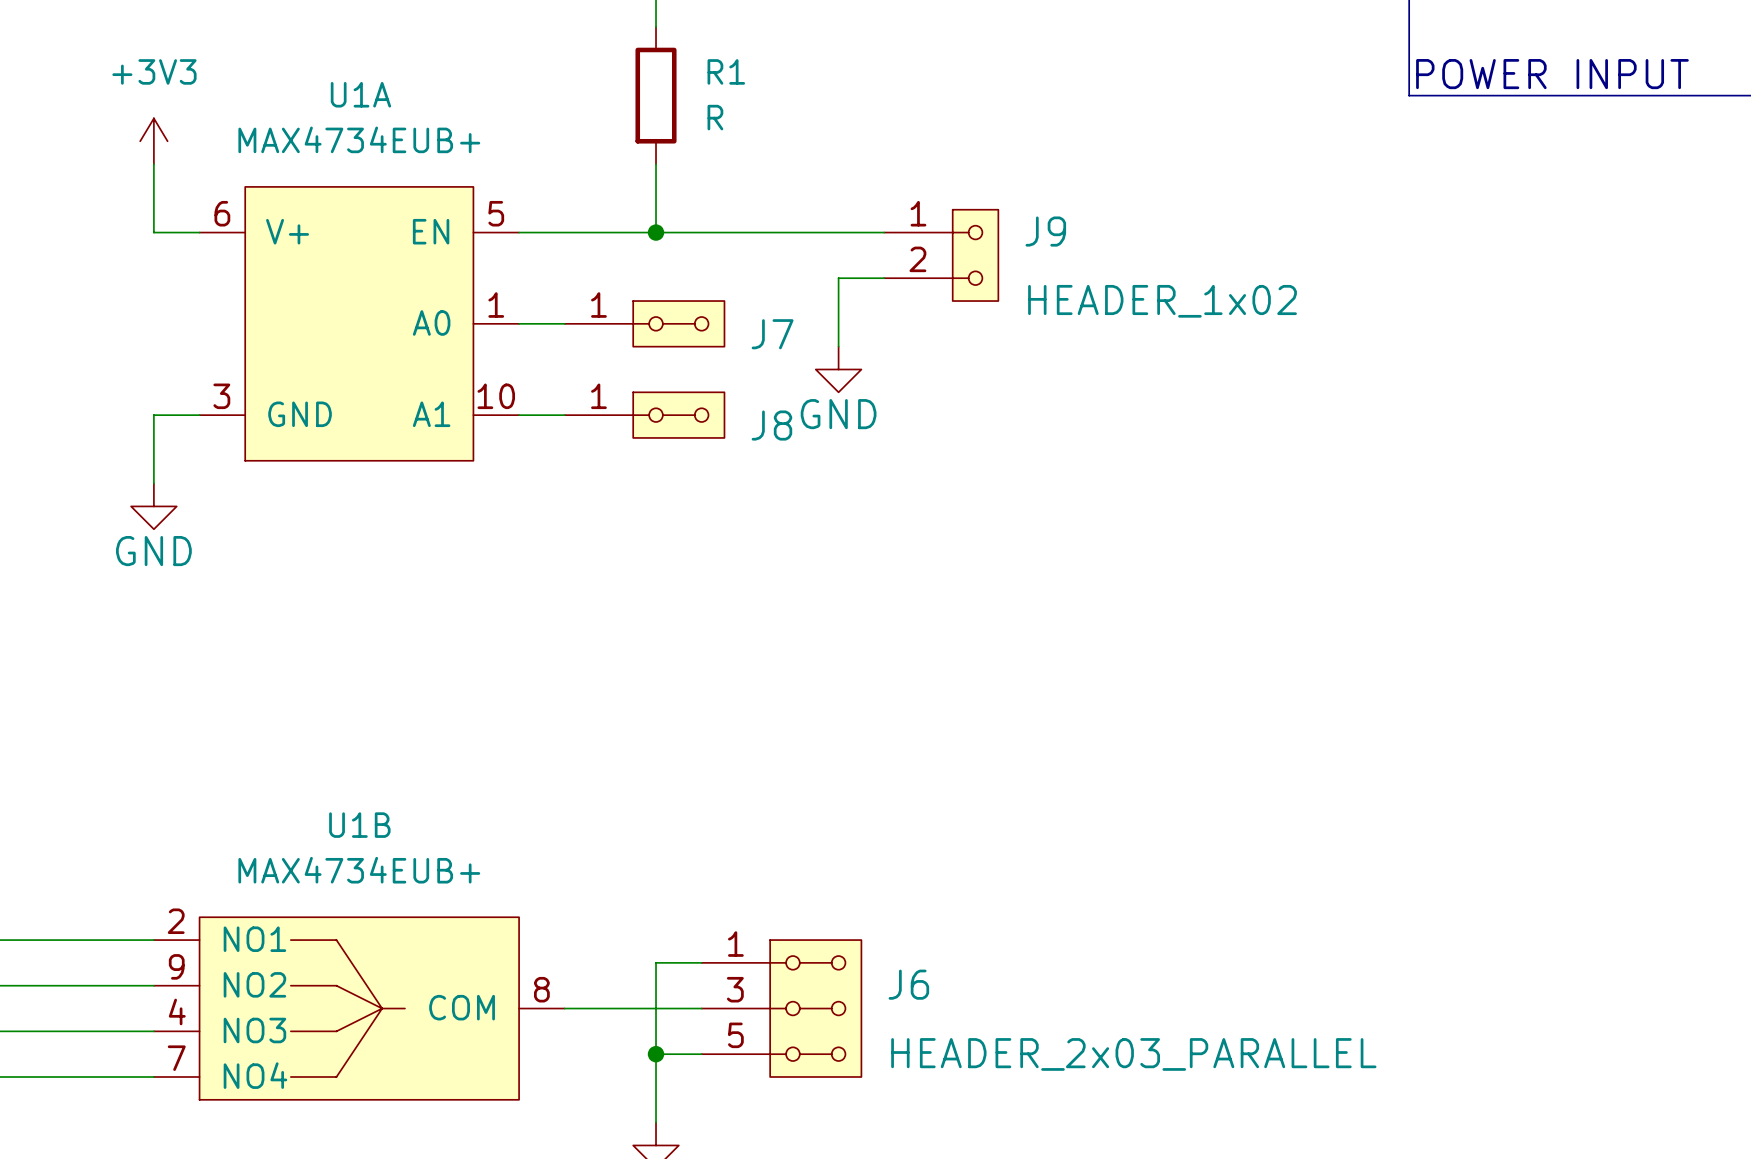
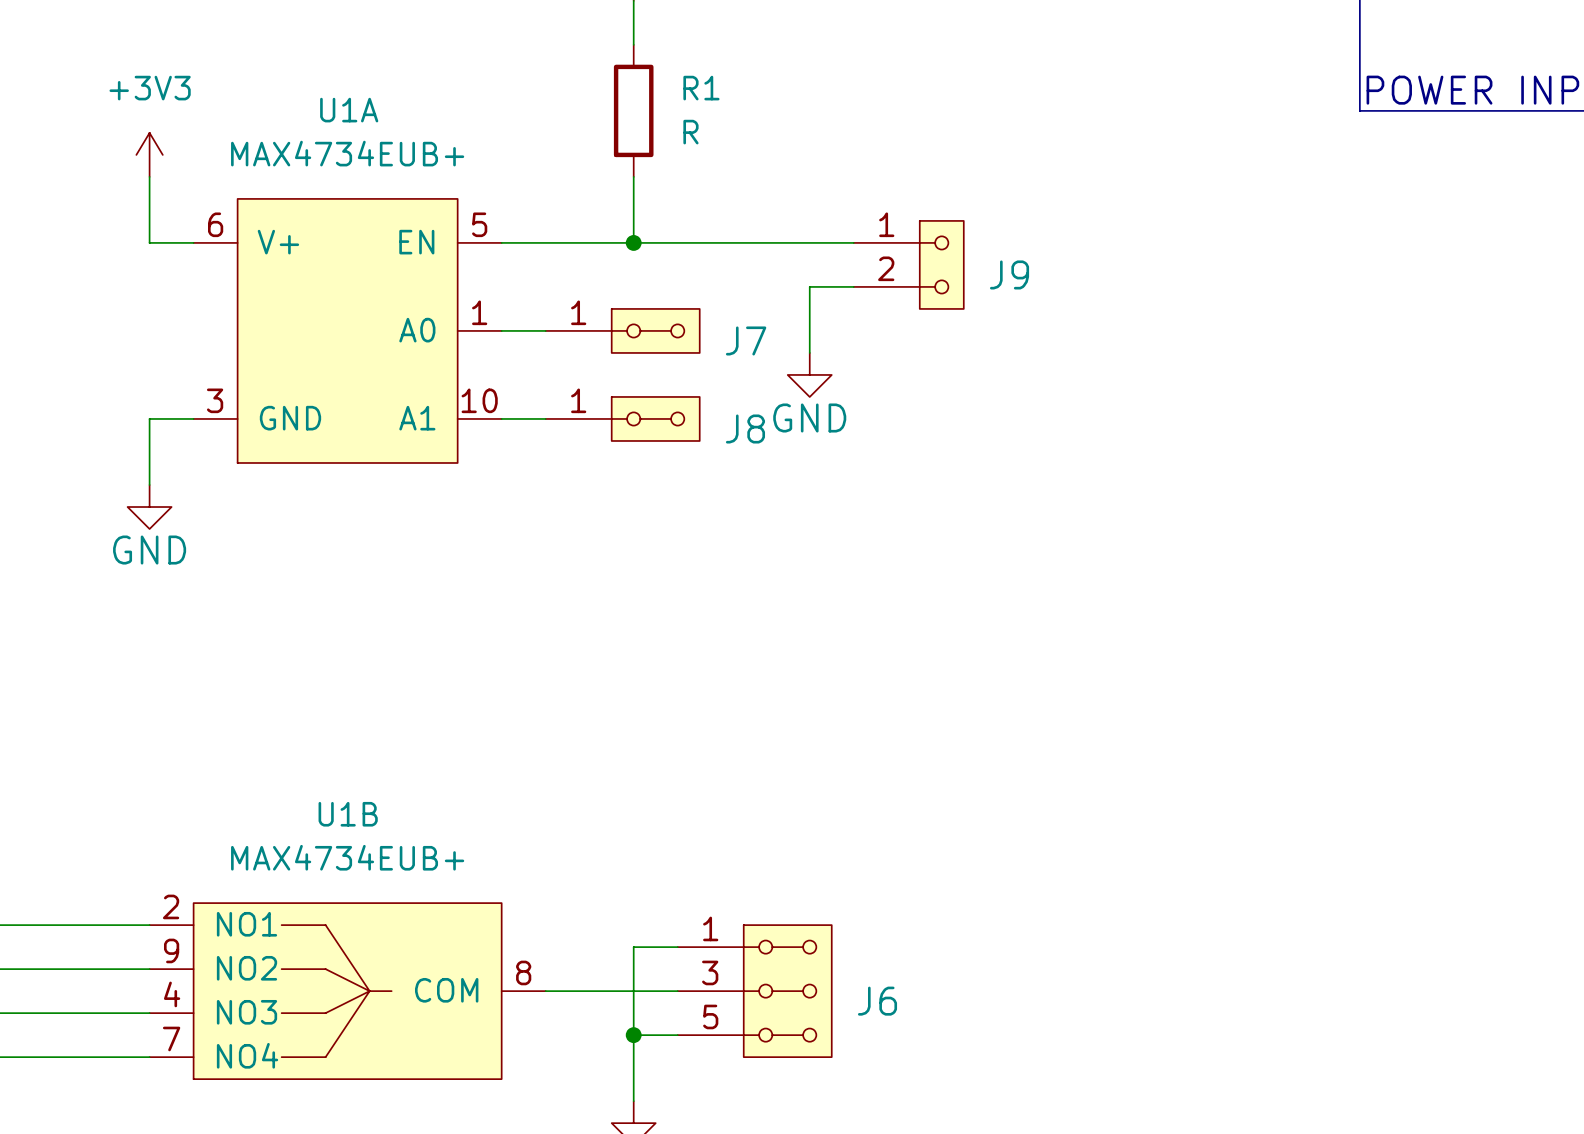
J9 name position: J9 (1045, 231) -> J9 (1009, 274)
J9 value: HEADER_1x02 (1162, 301) -> none
J6 name position: J6 (908, 984) -> J6 (877, 1001)
J6 value: HEADER_2x03_PARALLEL (1133, 1054) -> none

